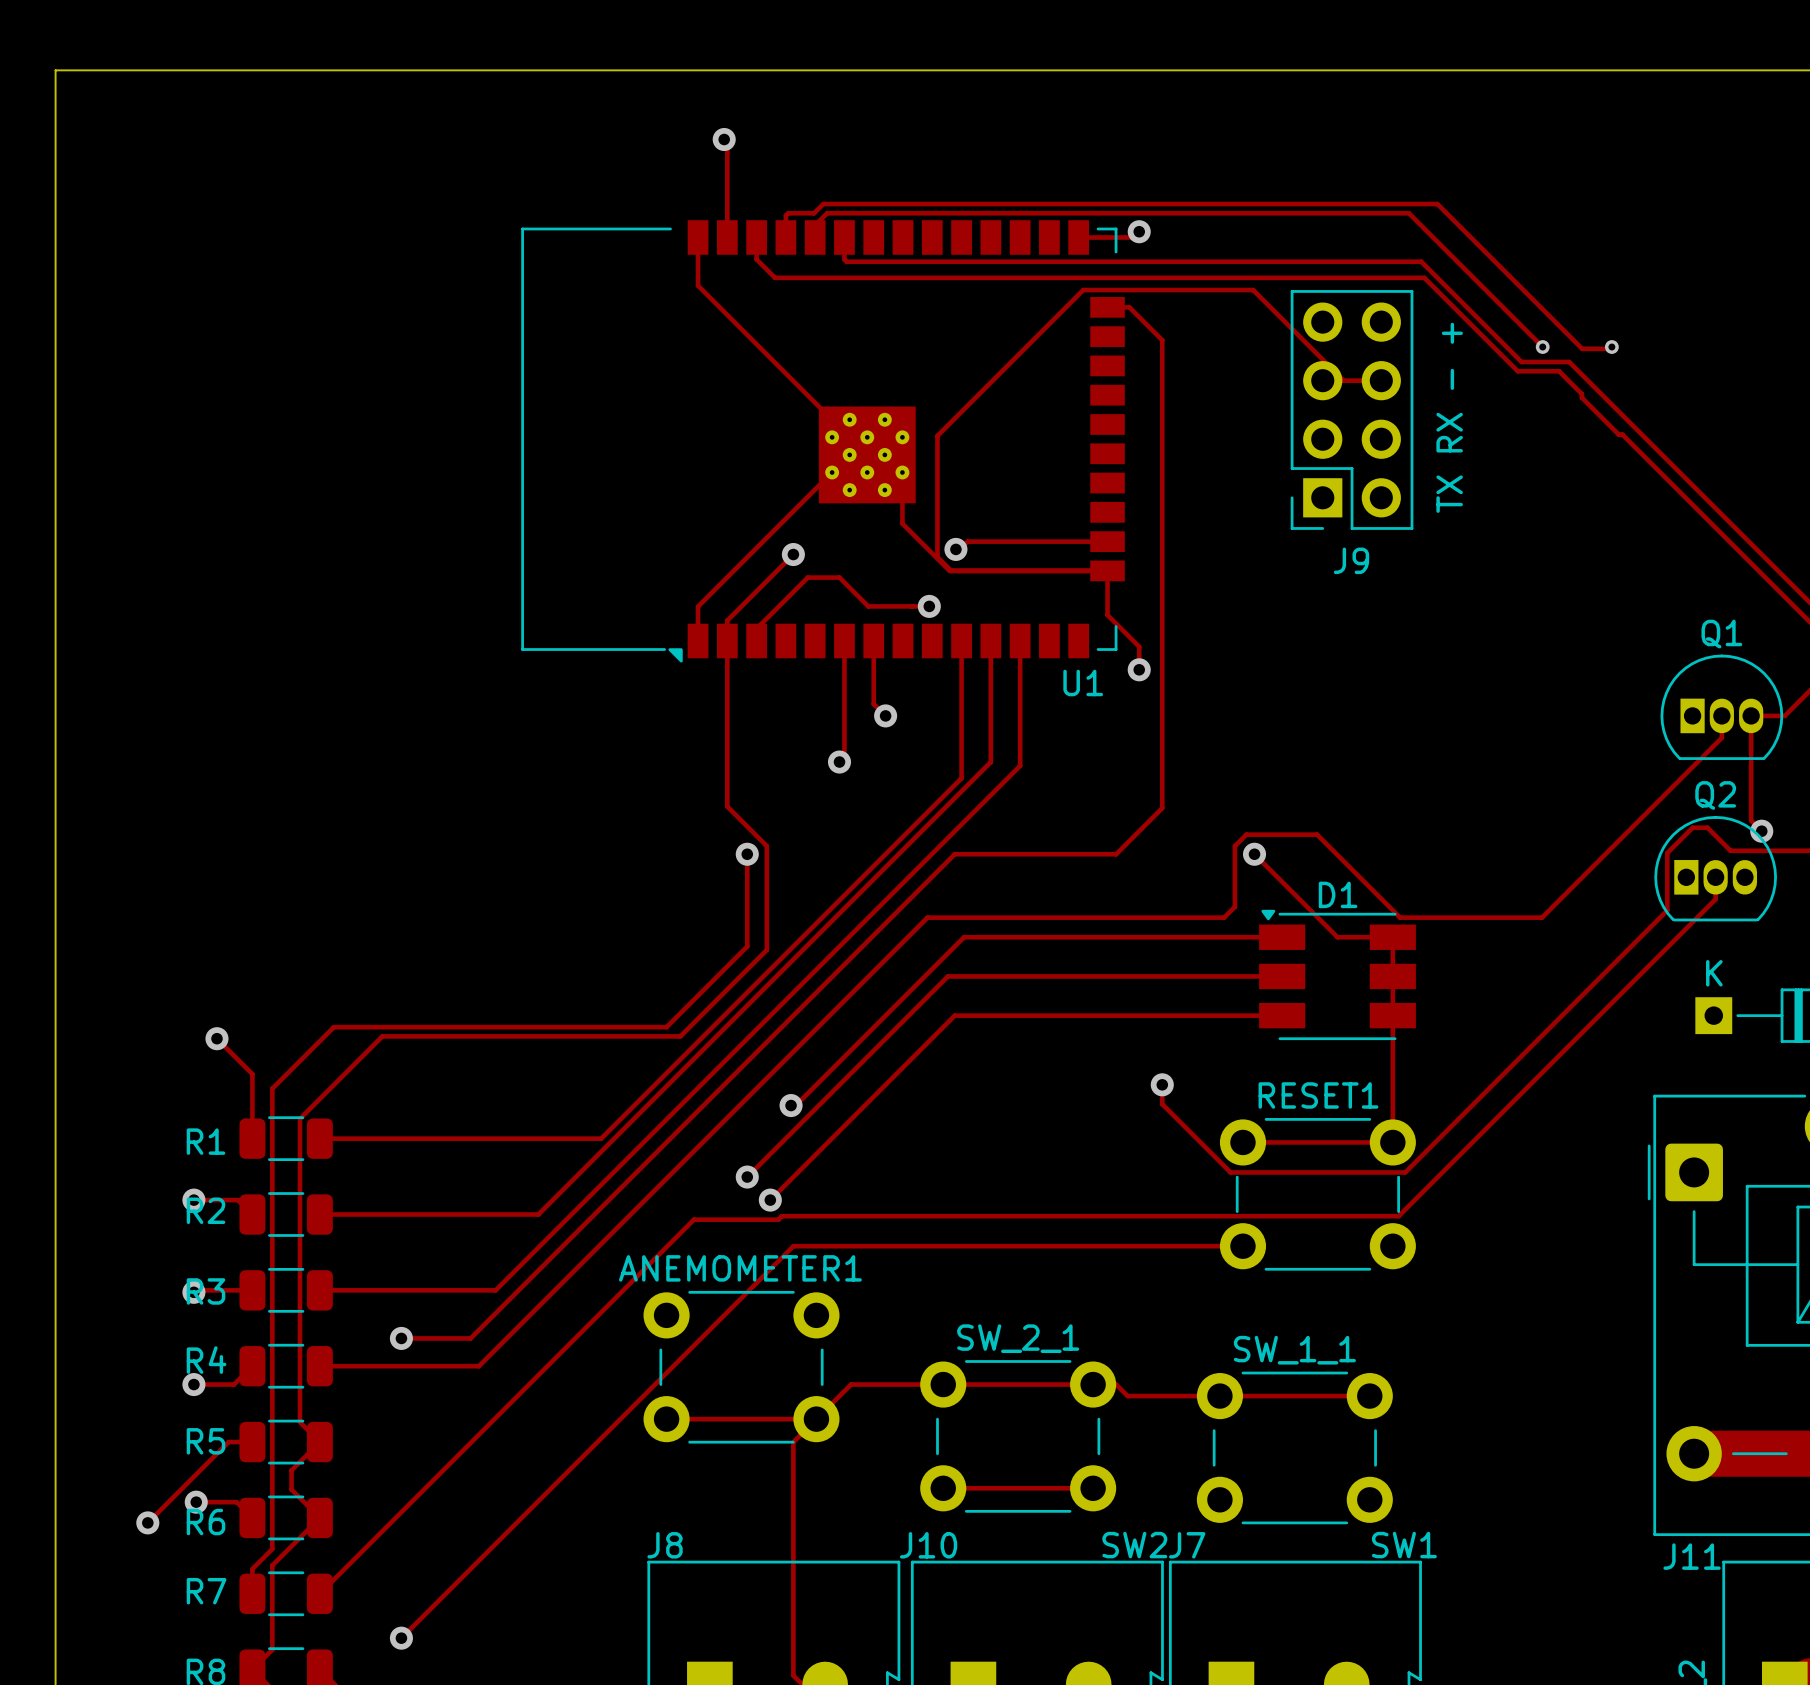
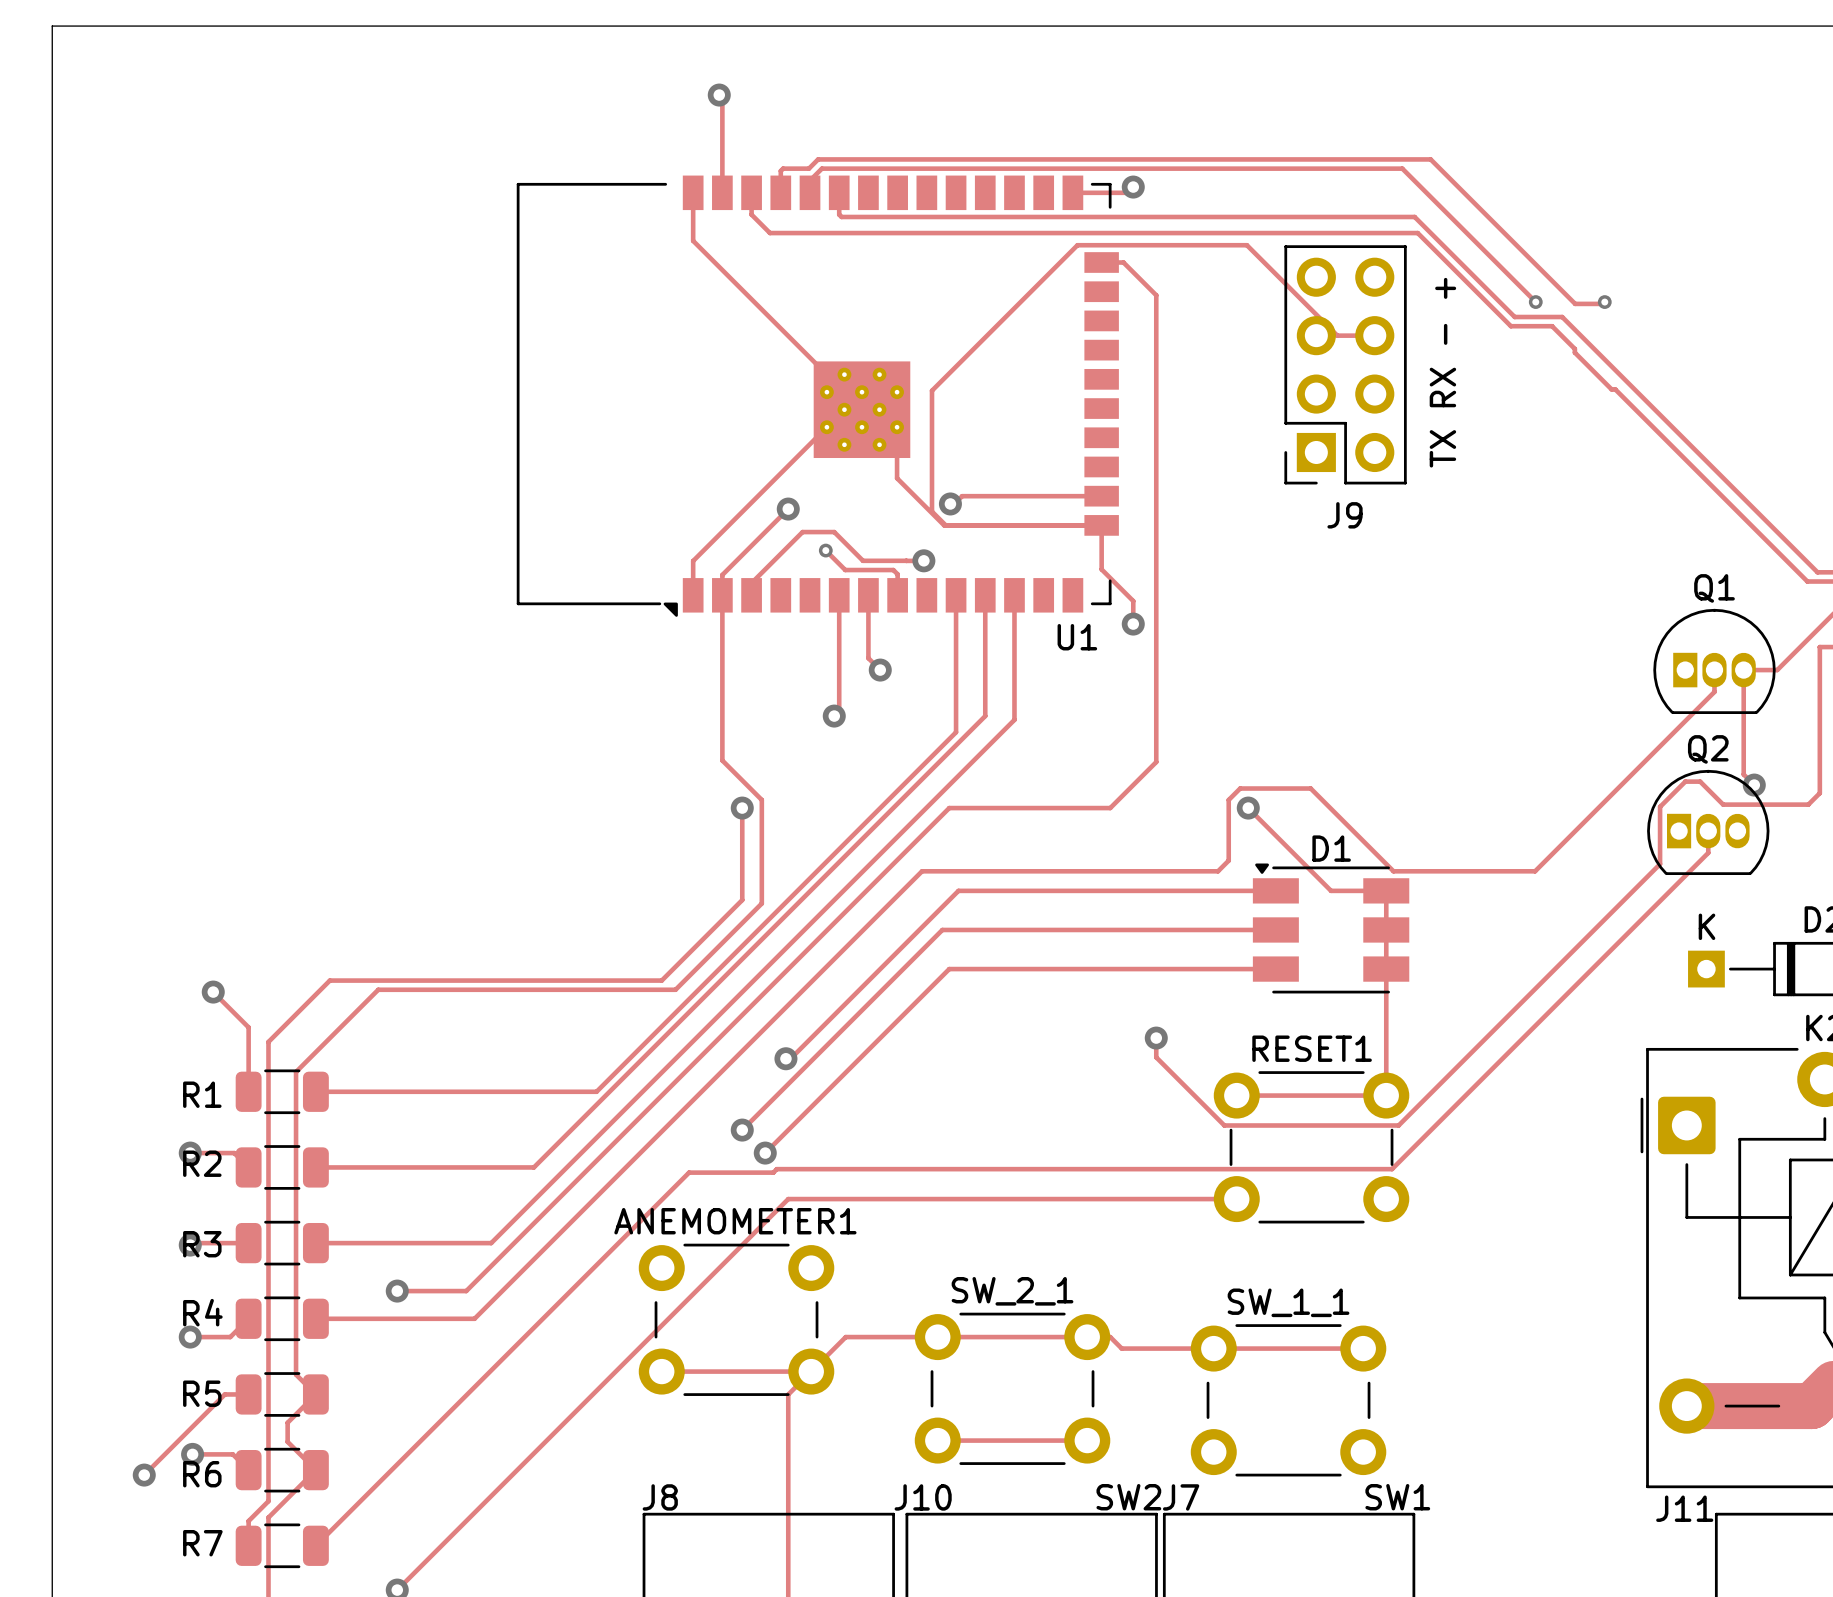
track: none -> (825, 550) (845, 570) (893, 570) (897, 574) (897, 595)
via: none -> (825, 550)

